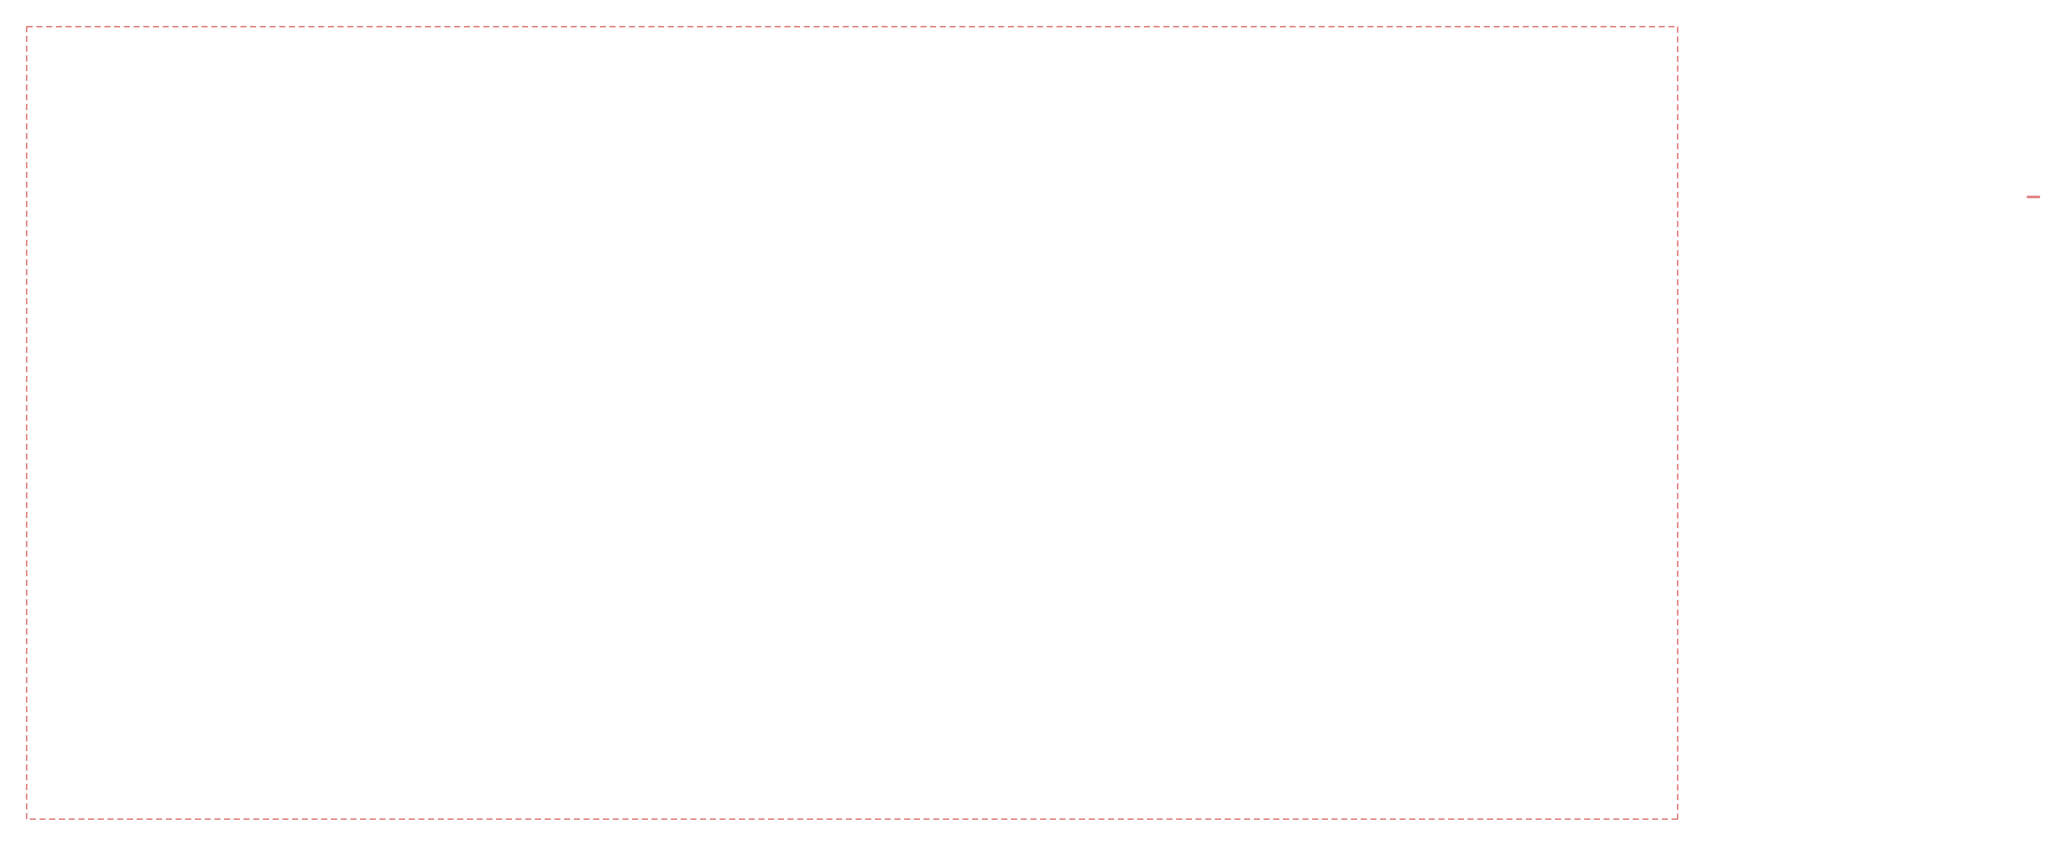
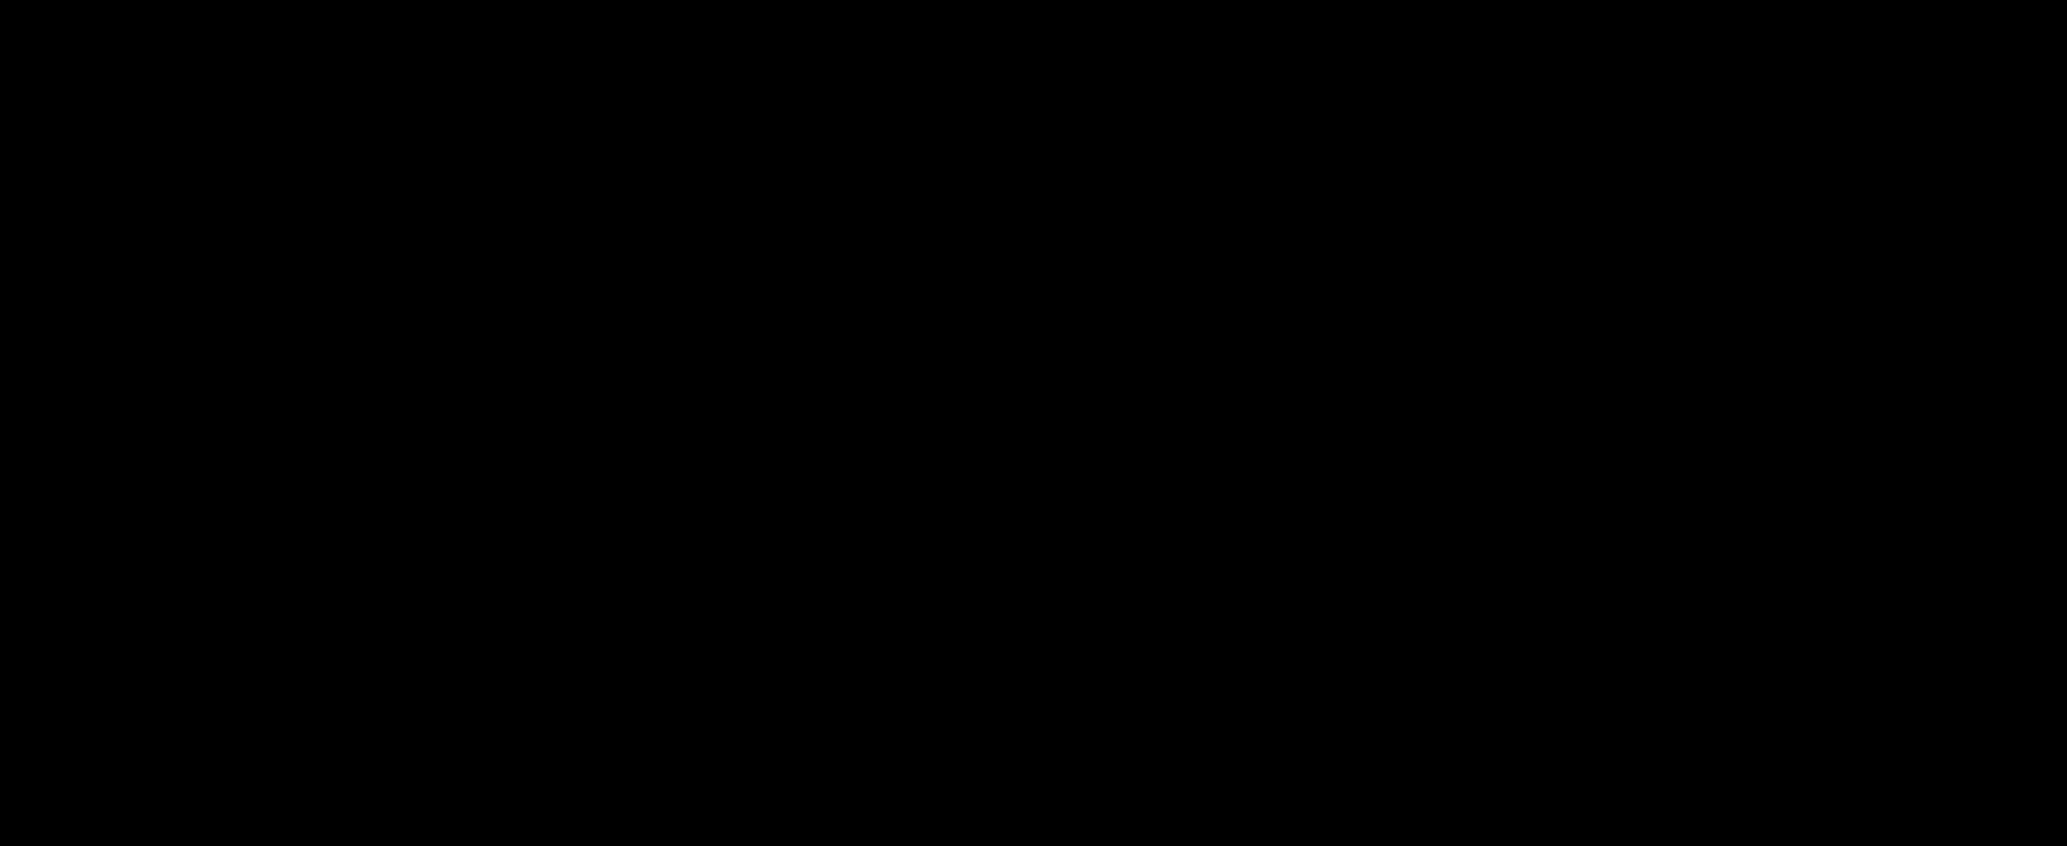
zone outline: (26, 26) (1677, 26) (1677, 819) (26, 819) (26, 26) -> none
track: (2027, 196) (2039, 196) -> none

